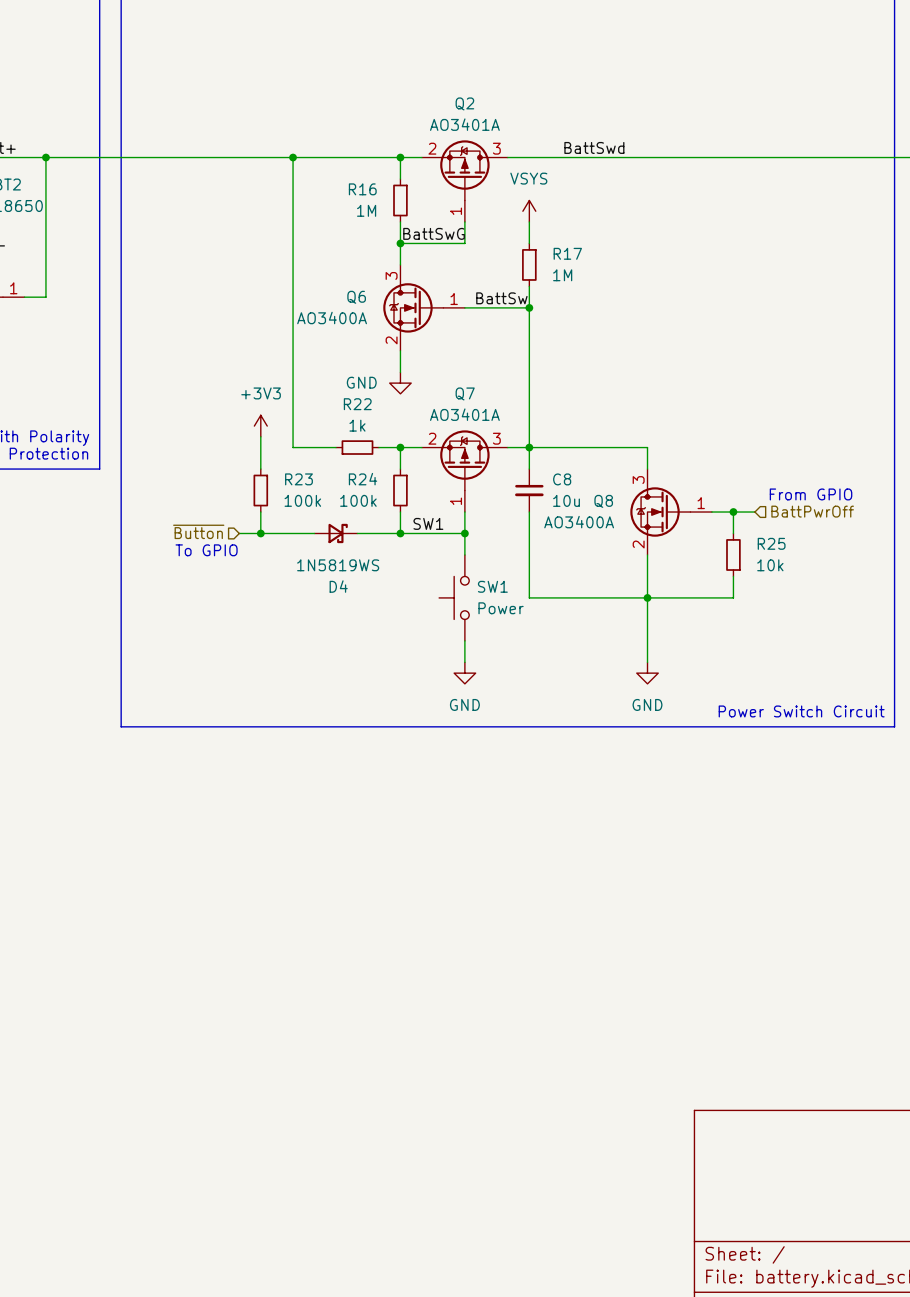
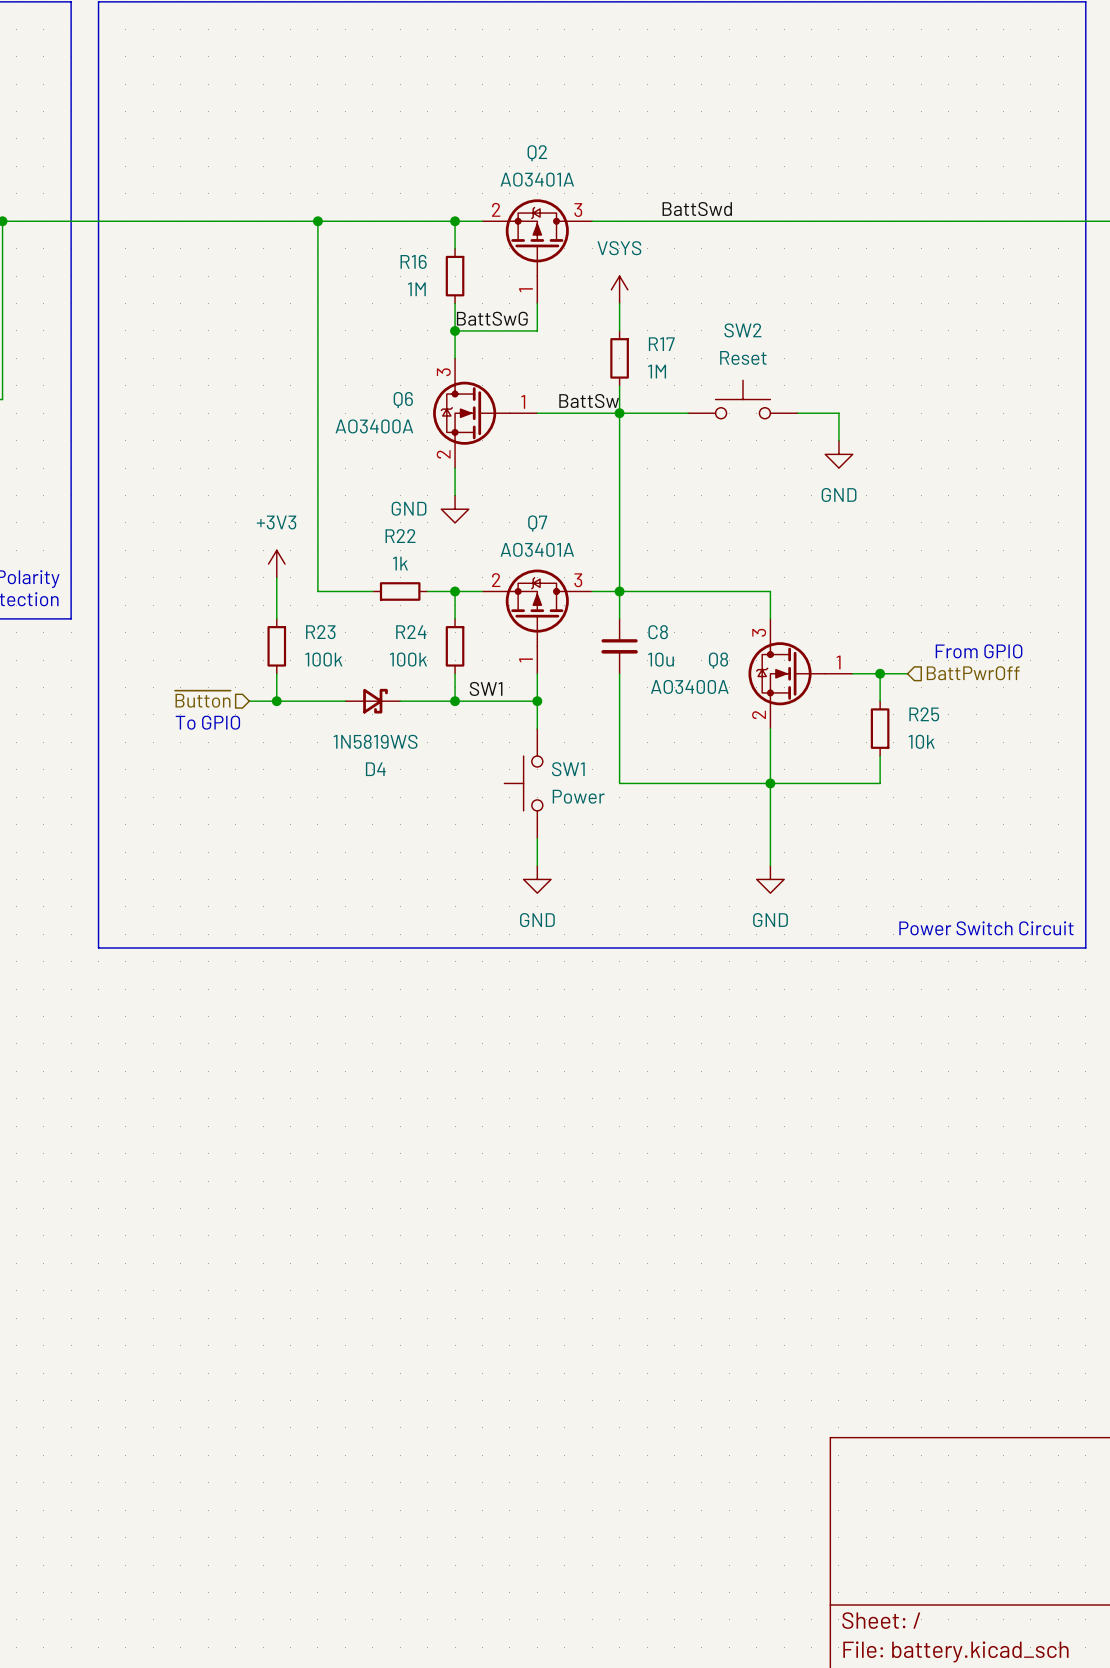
SW2: none -> Reset (742, 399)
wire: none -> (619, 413) (688, 413)
wire: none -> (797, 413) (838, 413) (838, 440)
power symbol: none -> GND (838, 454)

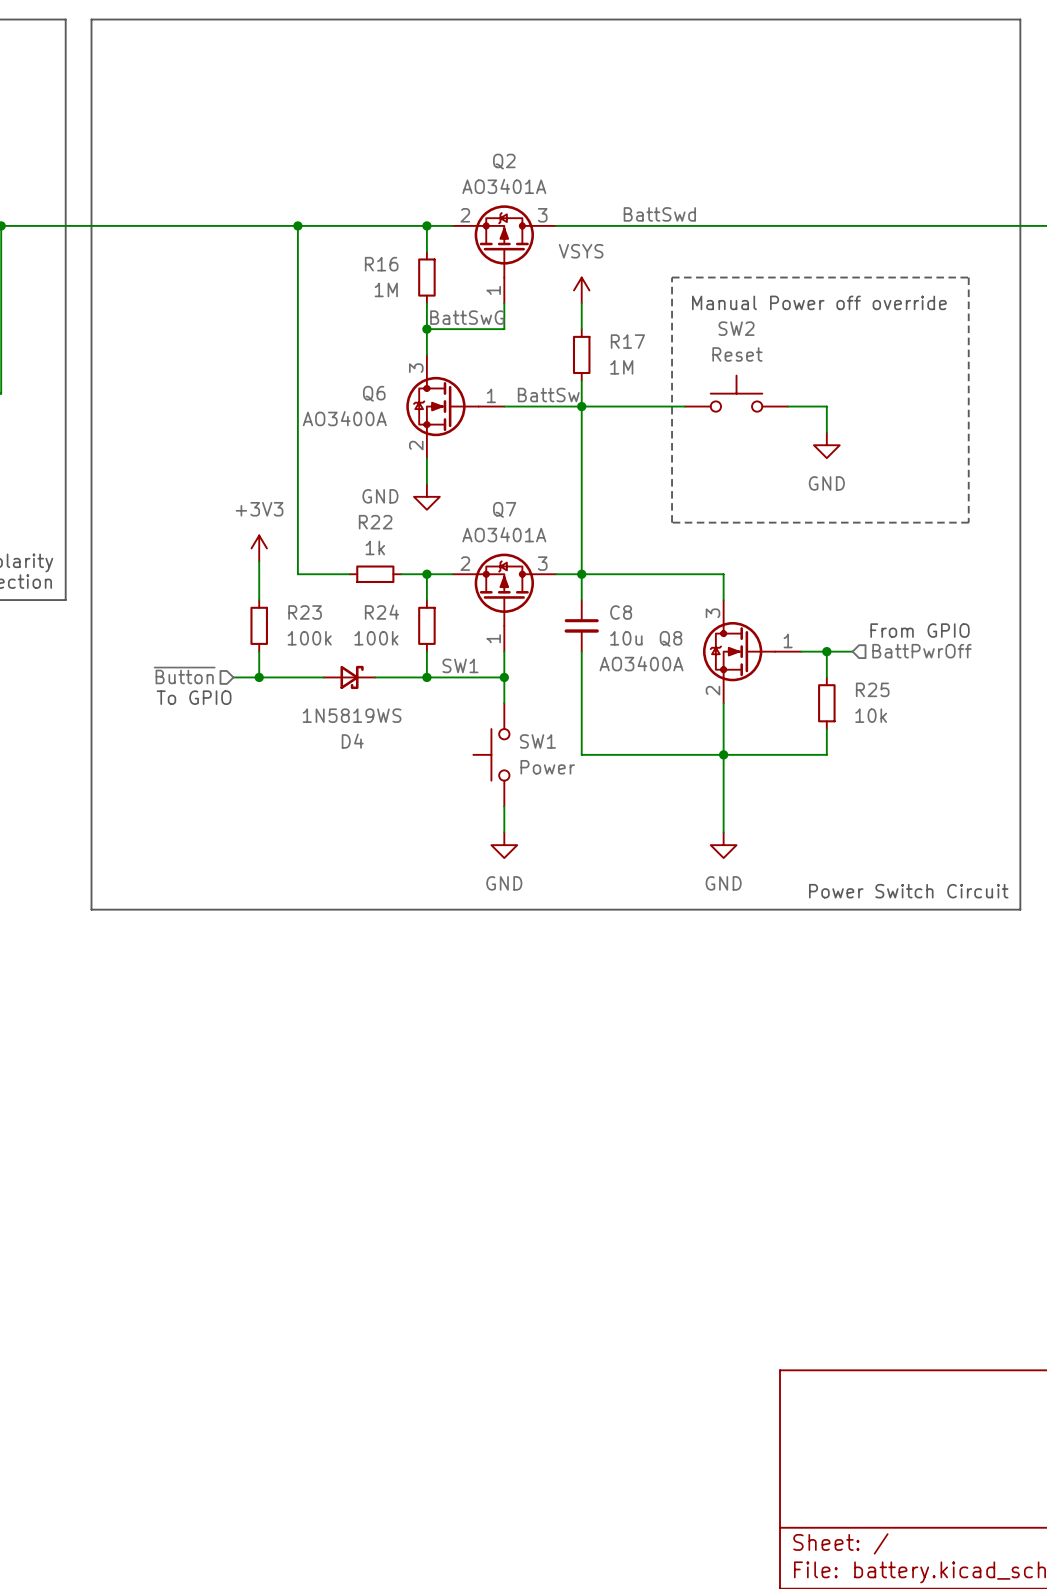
line: none -> (672, 277) (968, 277) (968, 522) (672, 522) (672, 277)
text: none -> Manual Power off override (819, 302)
SW2 position: (742, 399) -> (736, 393)
wire: (797, 413) (838, 413) (838, 440) -> (788, 406) (826, 406) (826, 432)
power symbol position: GND (838, 454) -> GND (826, 445)

